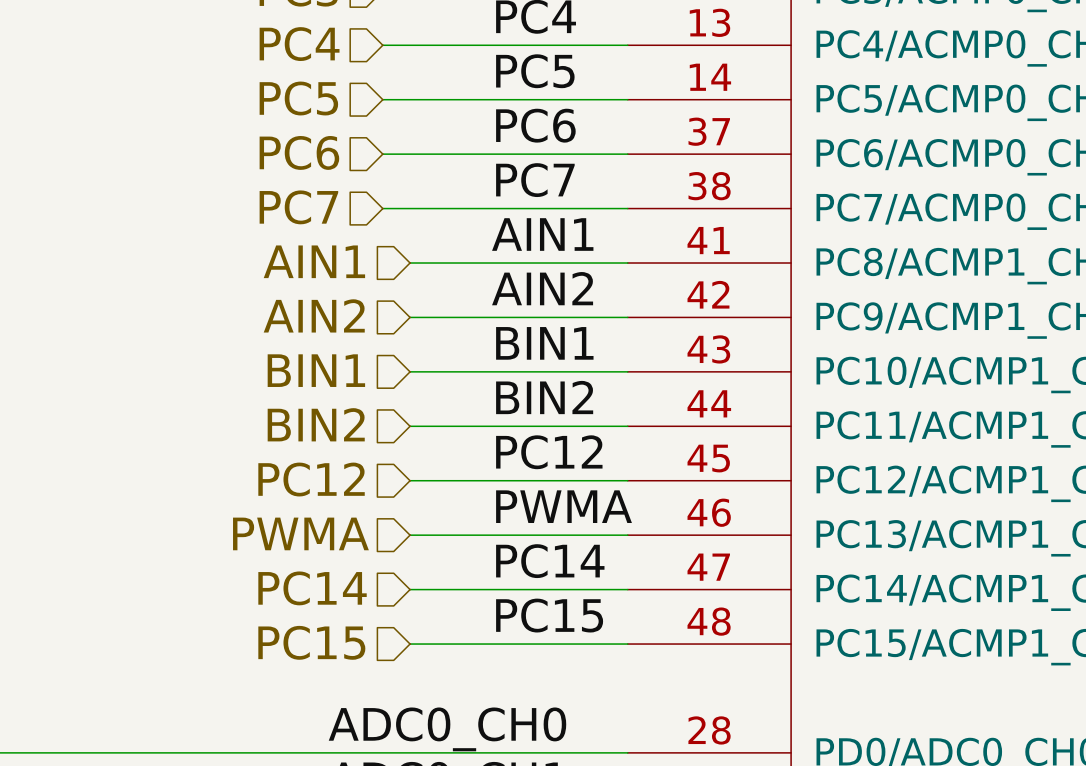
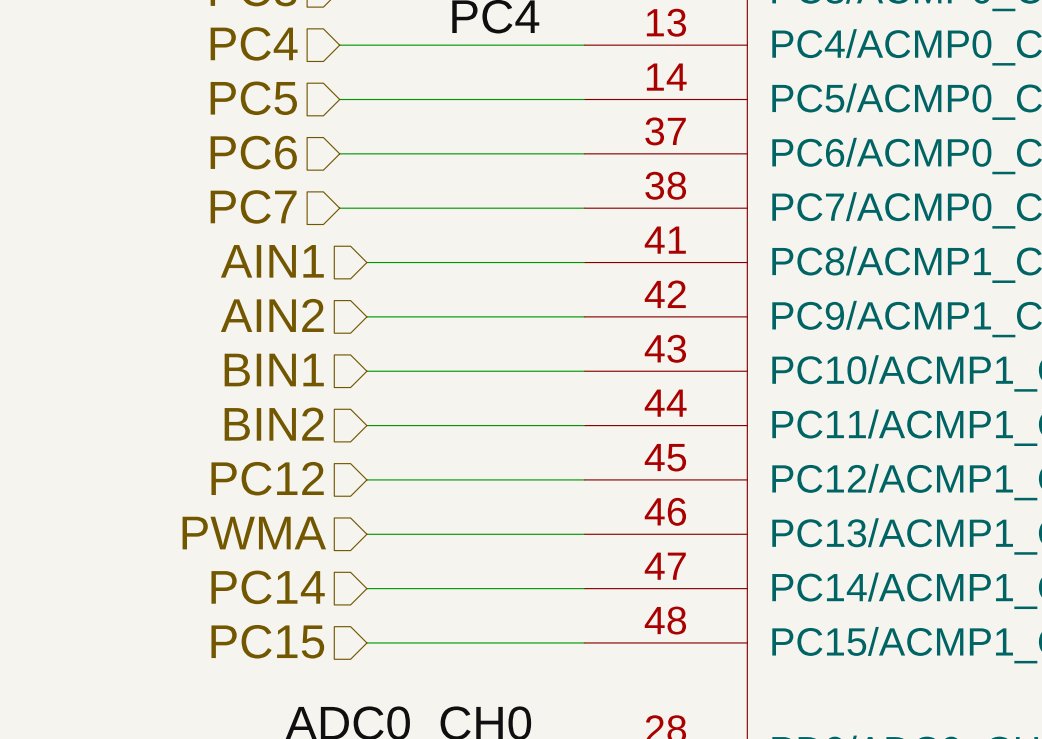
label: PC5 (535, 71) -> none
label: PC6 (535, 125) -> none
label: PC7 (535, 180) -> none
label: AIN1 (542, 234) -> none
label: AIN2 (542, 288) -> none
label: BIN1 (544, 343) -> none
label: BIN2 (544, 397) -> none
label: PC12 (549, 452) -> none
label: PWMA (564, 506) -> none
label: PC14 (550, 561) -> none
label: PC15 (549, 615) -> none

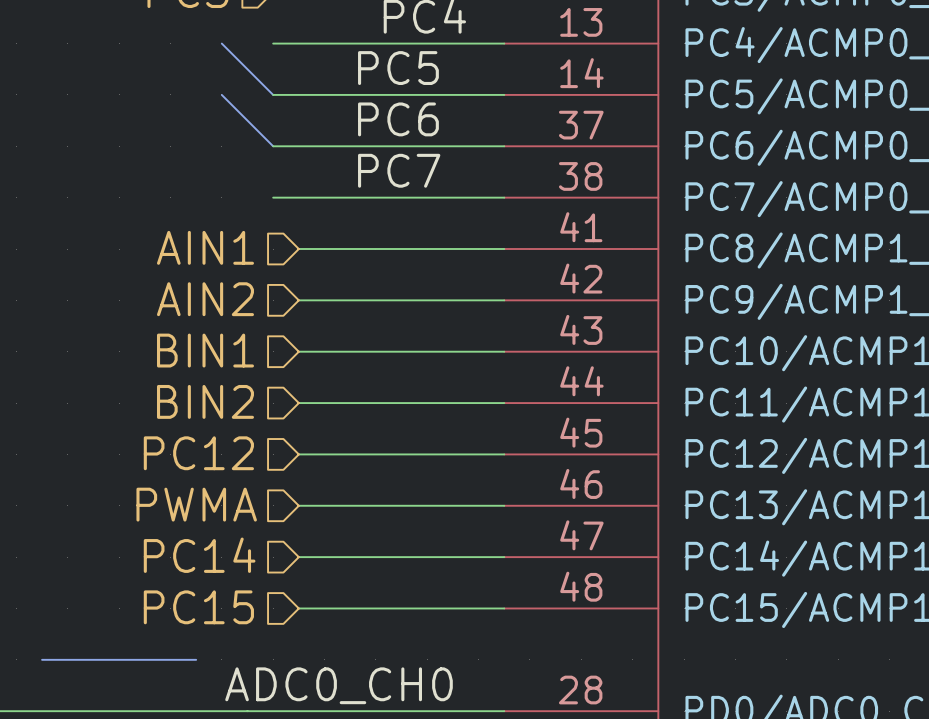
hierarchical label: PC4 (254, 43) -> none
bus: none -> (221, 43) (273, 94)
label: none -> PC5 (398, 68)
hierarchical label: PC5 (253, 98) -> none
bus: none -> (221, 94) (273, 146)
label: none -> PC6 (398, 119)
hierarchical label: PC6 (253, 152) -> none
label: none -> PC7 (399, 170)
hierarchical label: PC7 (253, 206) -> none
bus: none -> (42, 659) (196, 659)

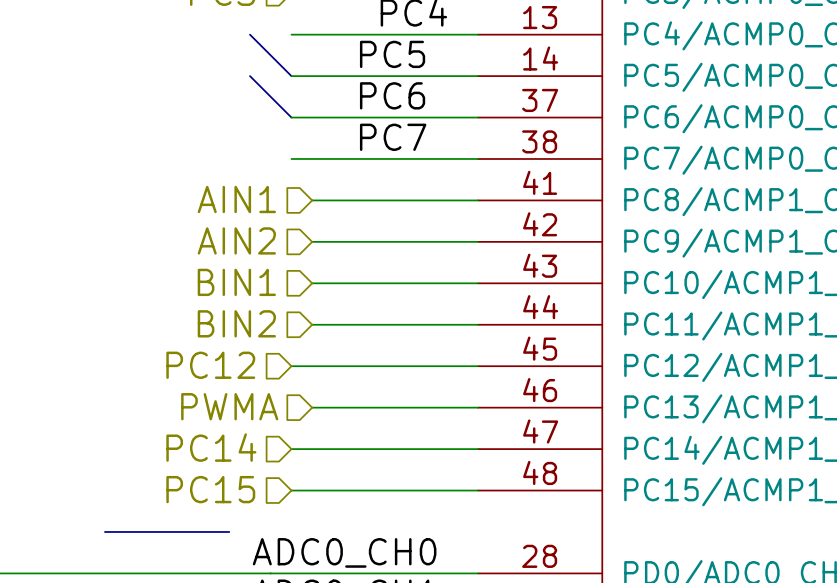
hierarchical label position: PC12 (198, 453) -> PC12 (210, 365)
wire: none -> (291, 366) (312, 366)
hierarchical label position: PC14 (199, 555) -> PC14 (211, 447)
wire: none -> (291, 449) (312, 449)
hierarchical label position: PC15 (198, 607) -> PC15 (210, 489)
wire: none -> (291, 490) (312, 490)

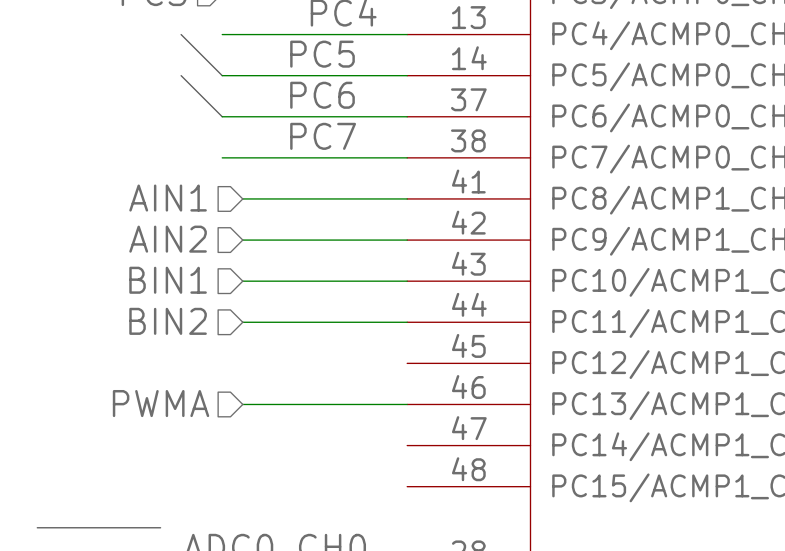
hierarchical label: PC12 (210, 365) -> none
wire: (291, 366) (477, 366) -> none
hierarchical label: PC14 (211, 447) -> none
wire: (291, 449) (477, 449) -> none
hierarchical label: PC15 (210, 489) -> none
wire: (291, 490) (477, 490) -> none

